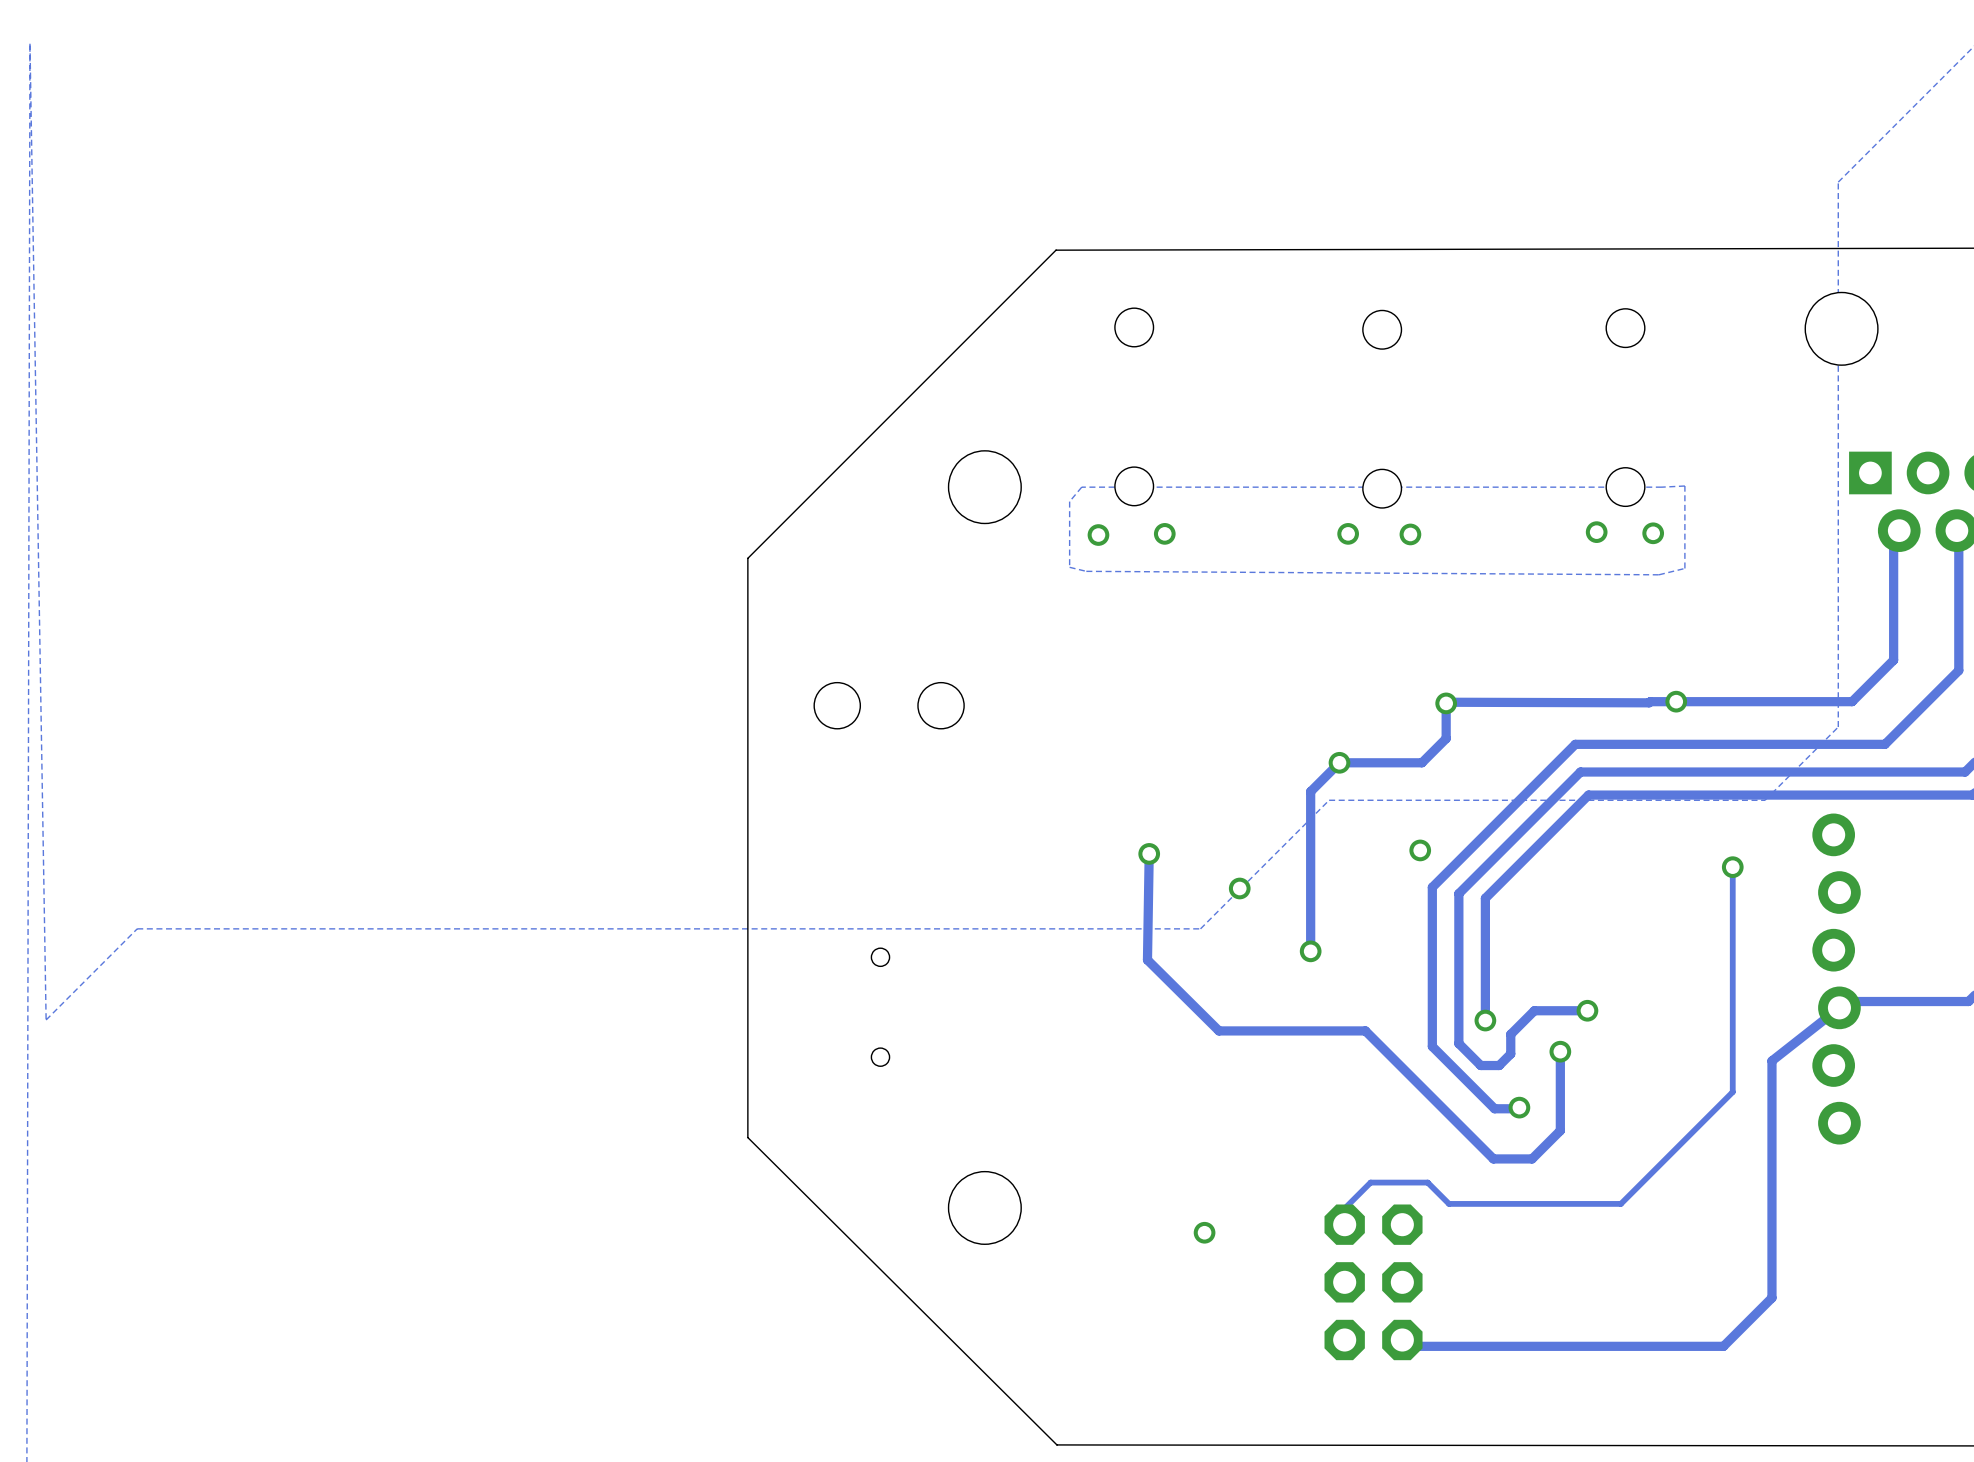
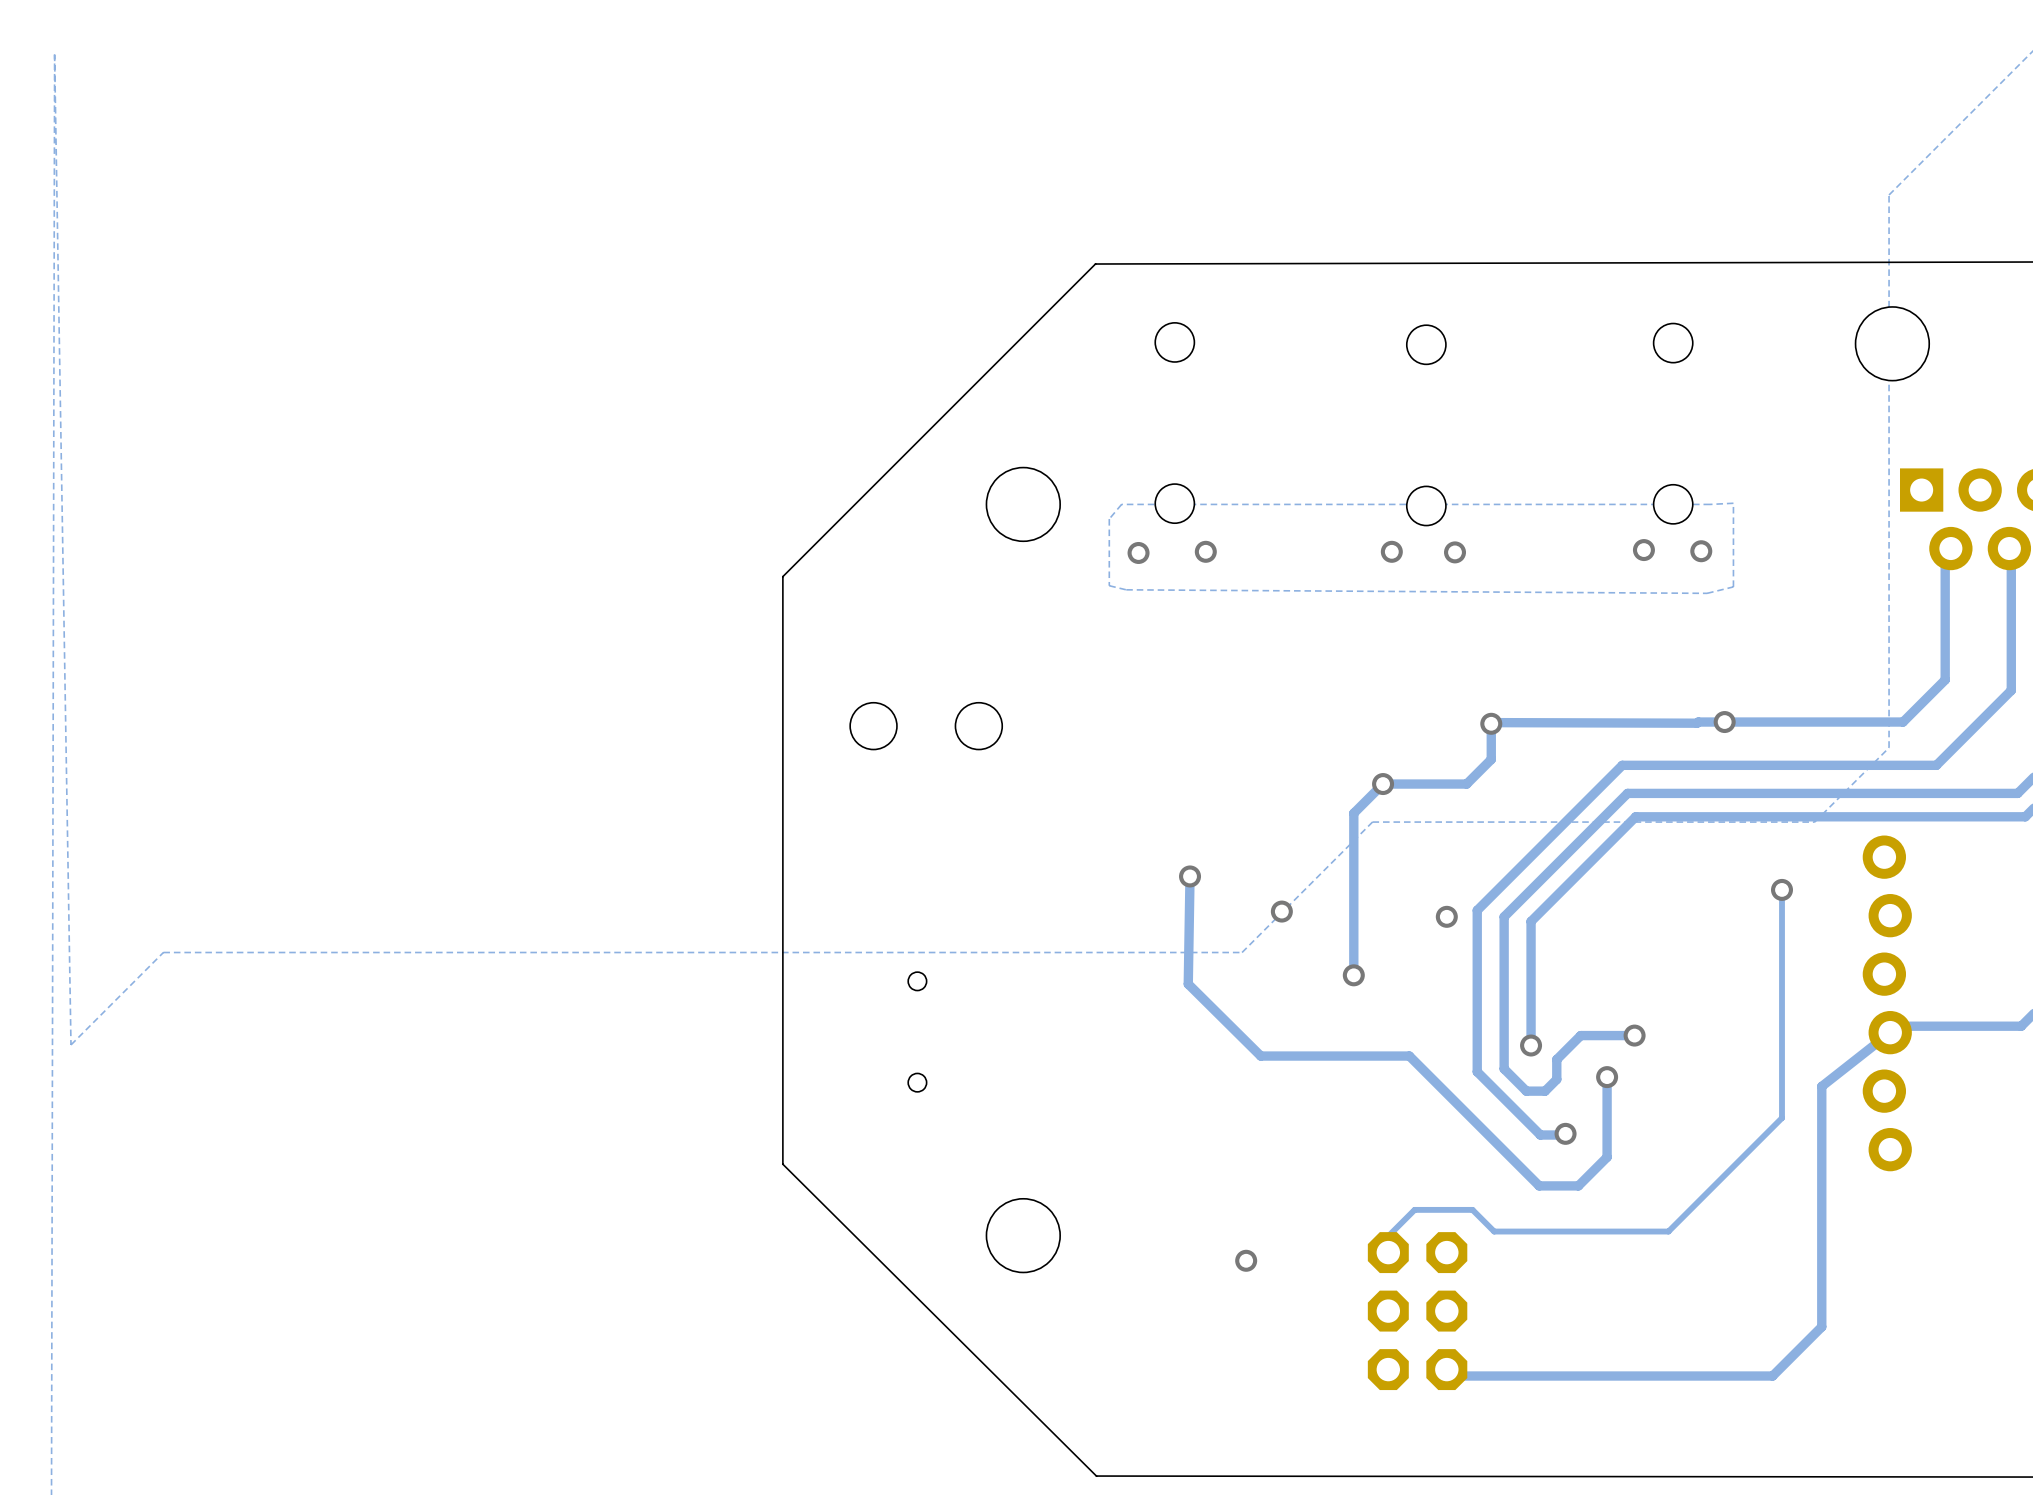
via position: (1420, 850) -> (1446, 916)

